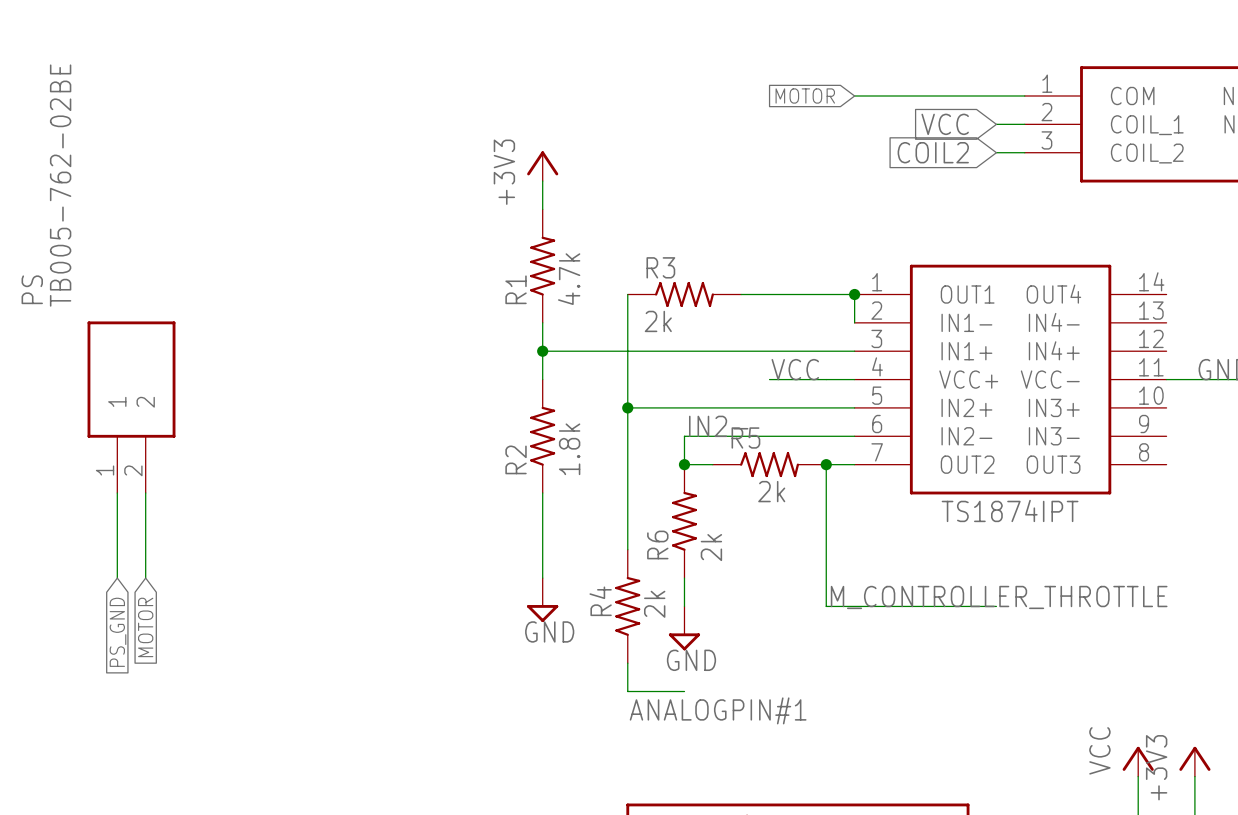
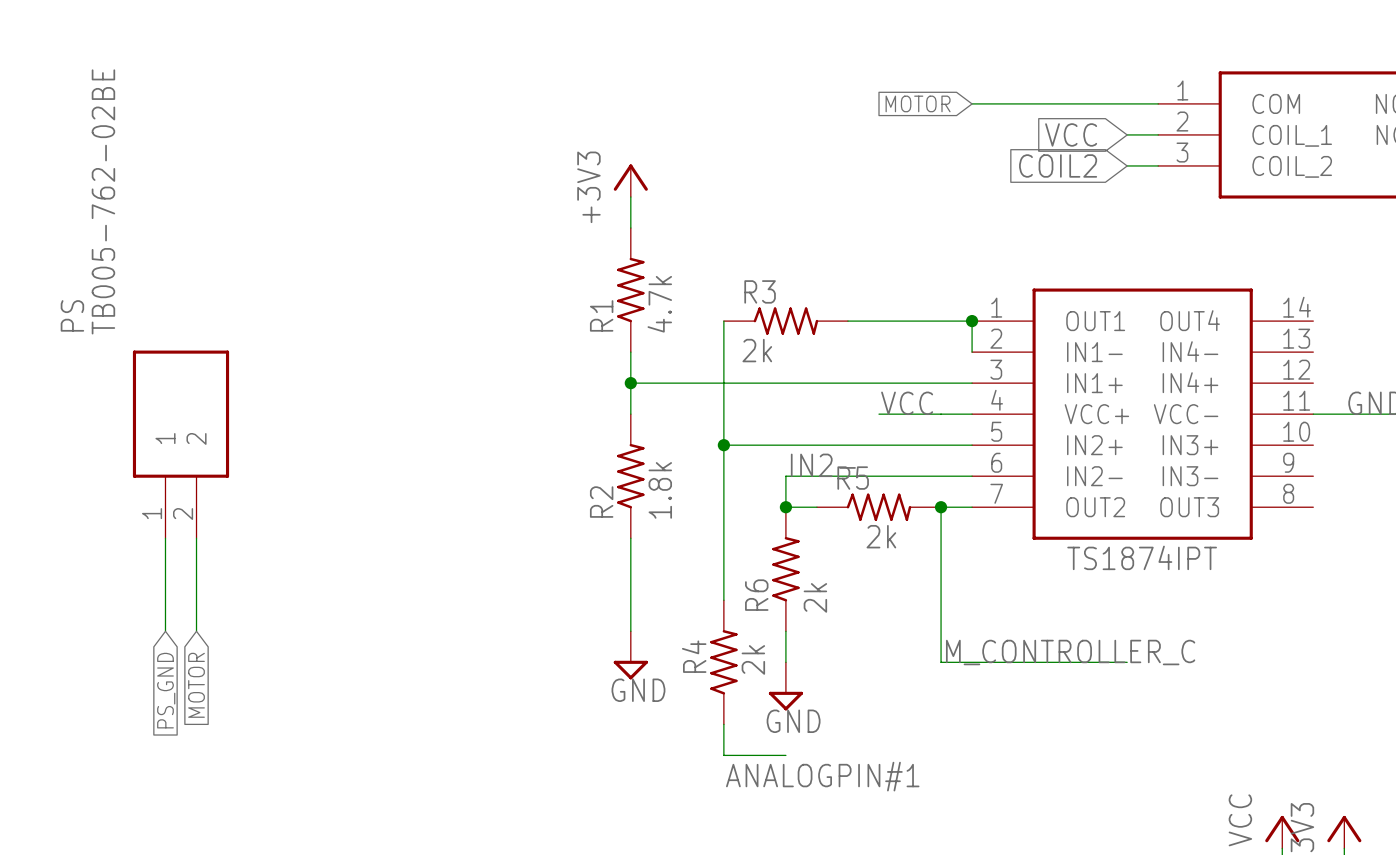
label: M_CONTROLLER_THROTTLE (999, 597) -> M_CONTROLLER_C (1070, 652)

